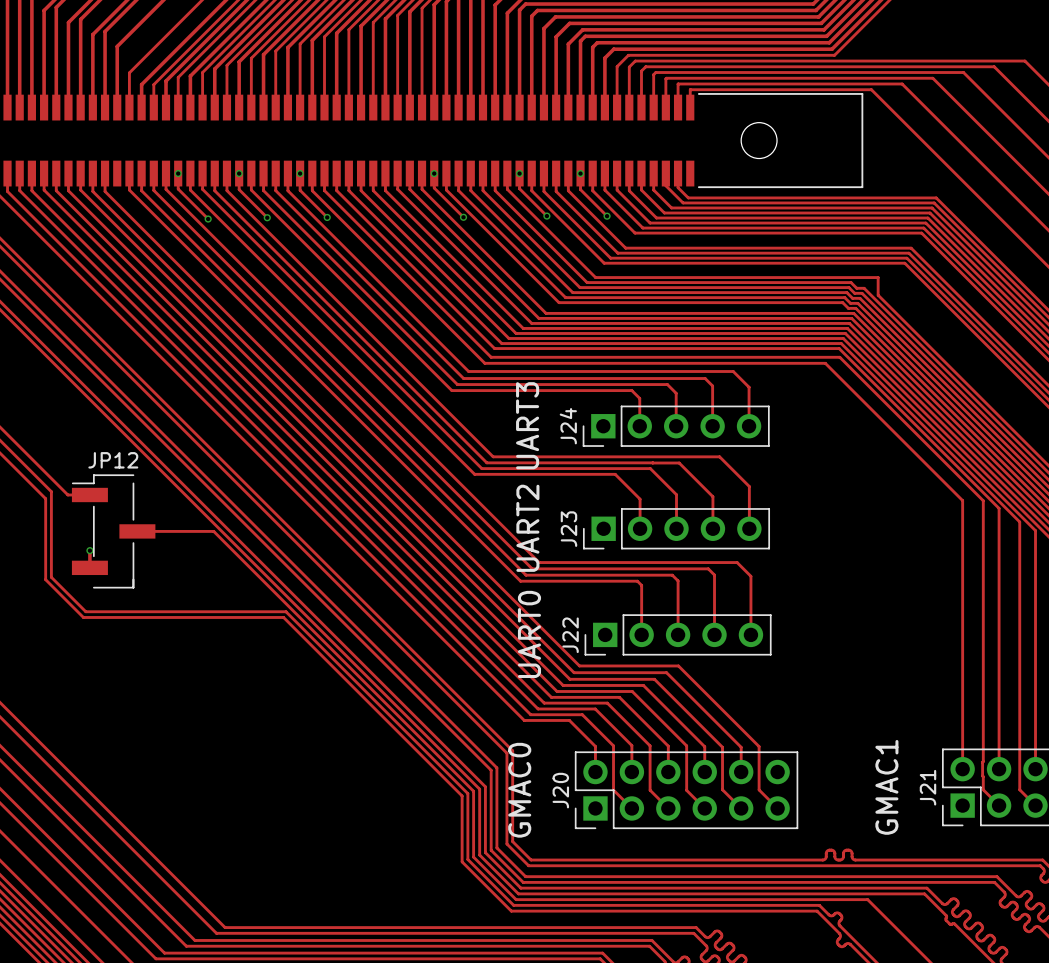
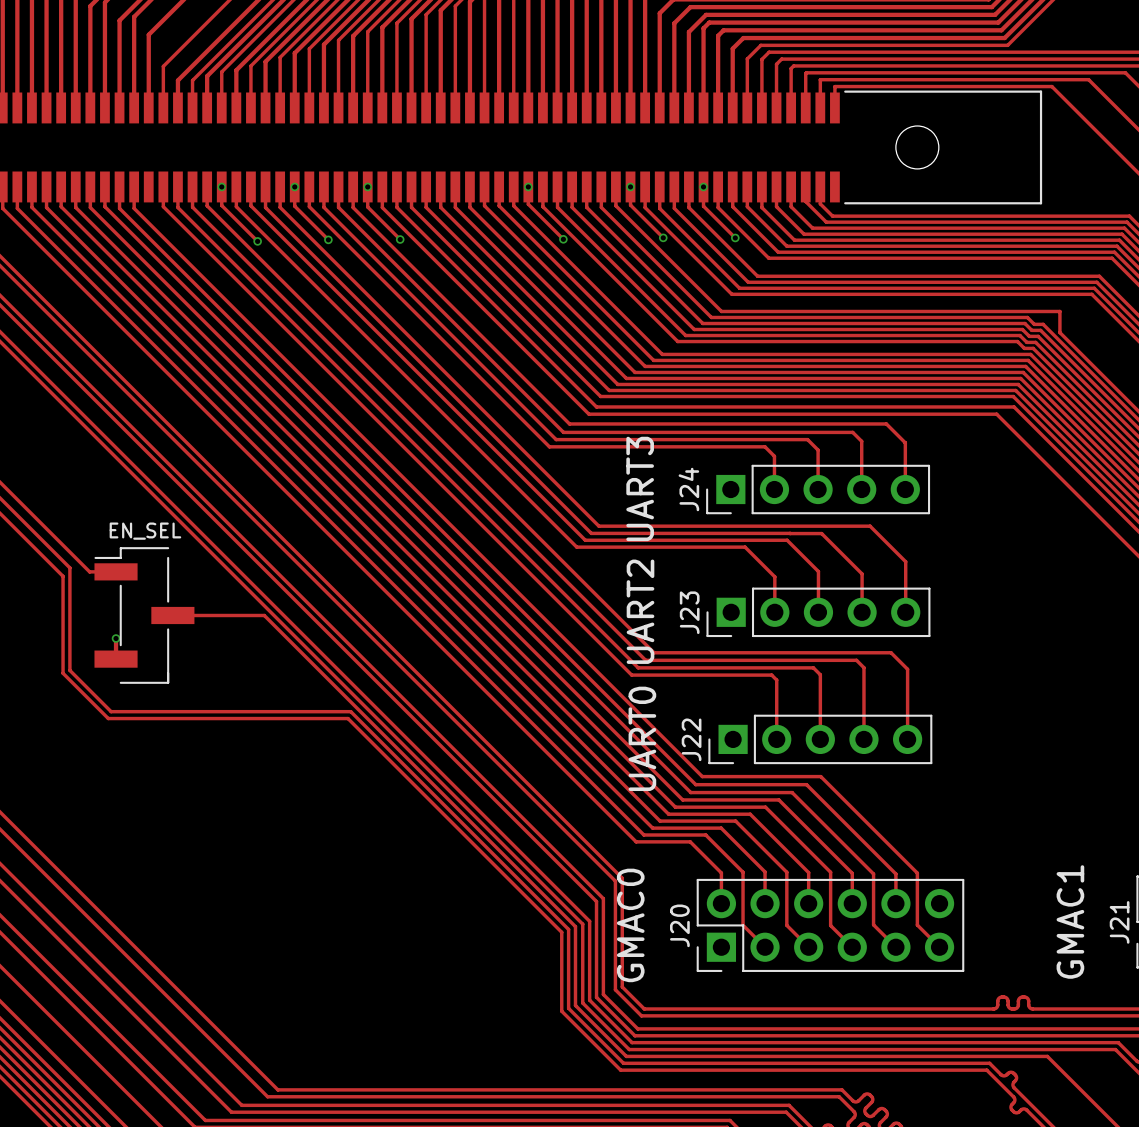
JP12 name: JP12 (113, 460) -> none
JP12 value: none -> EN_SEL (145, 531)

